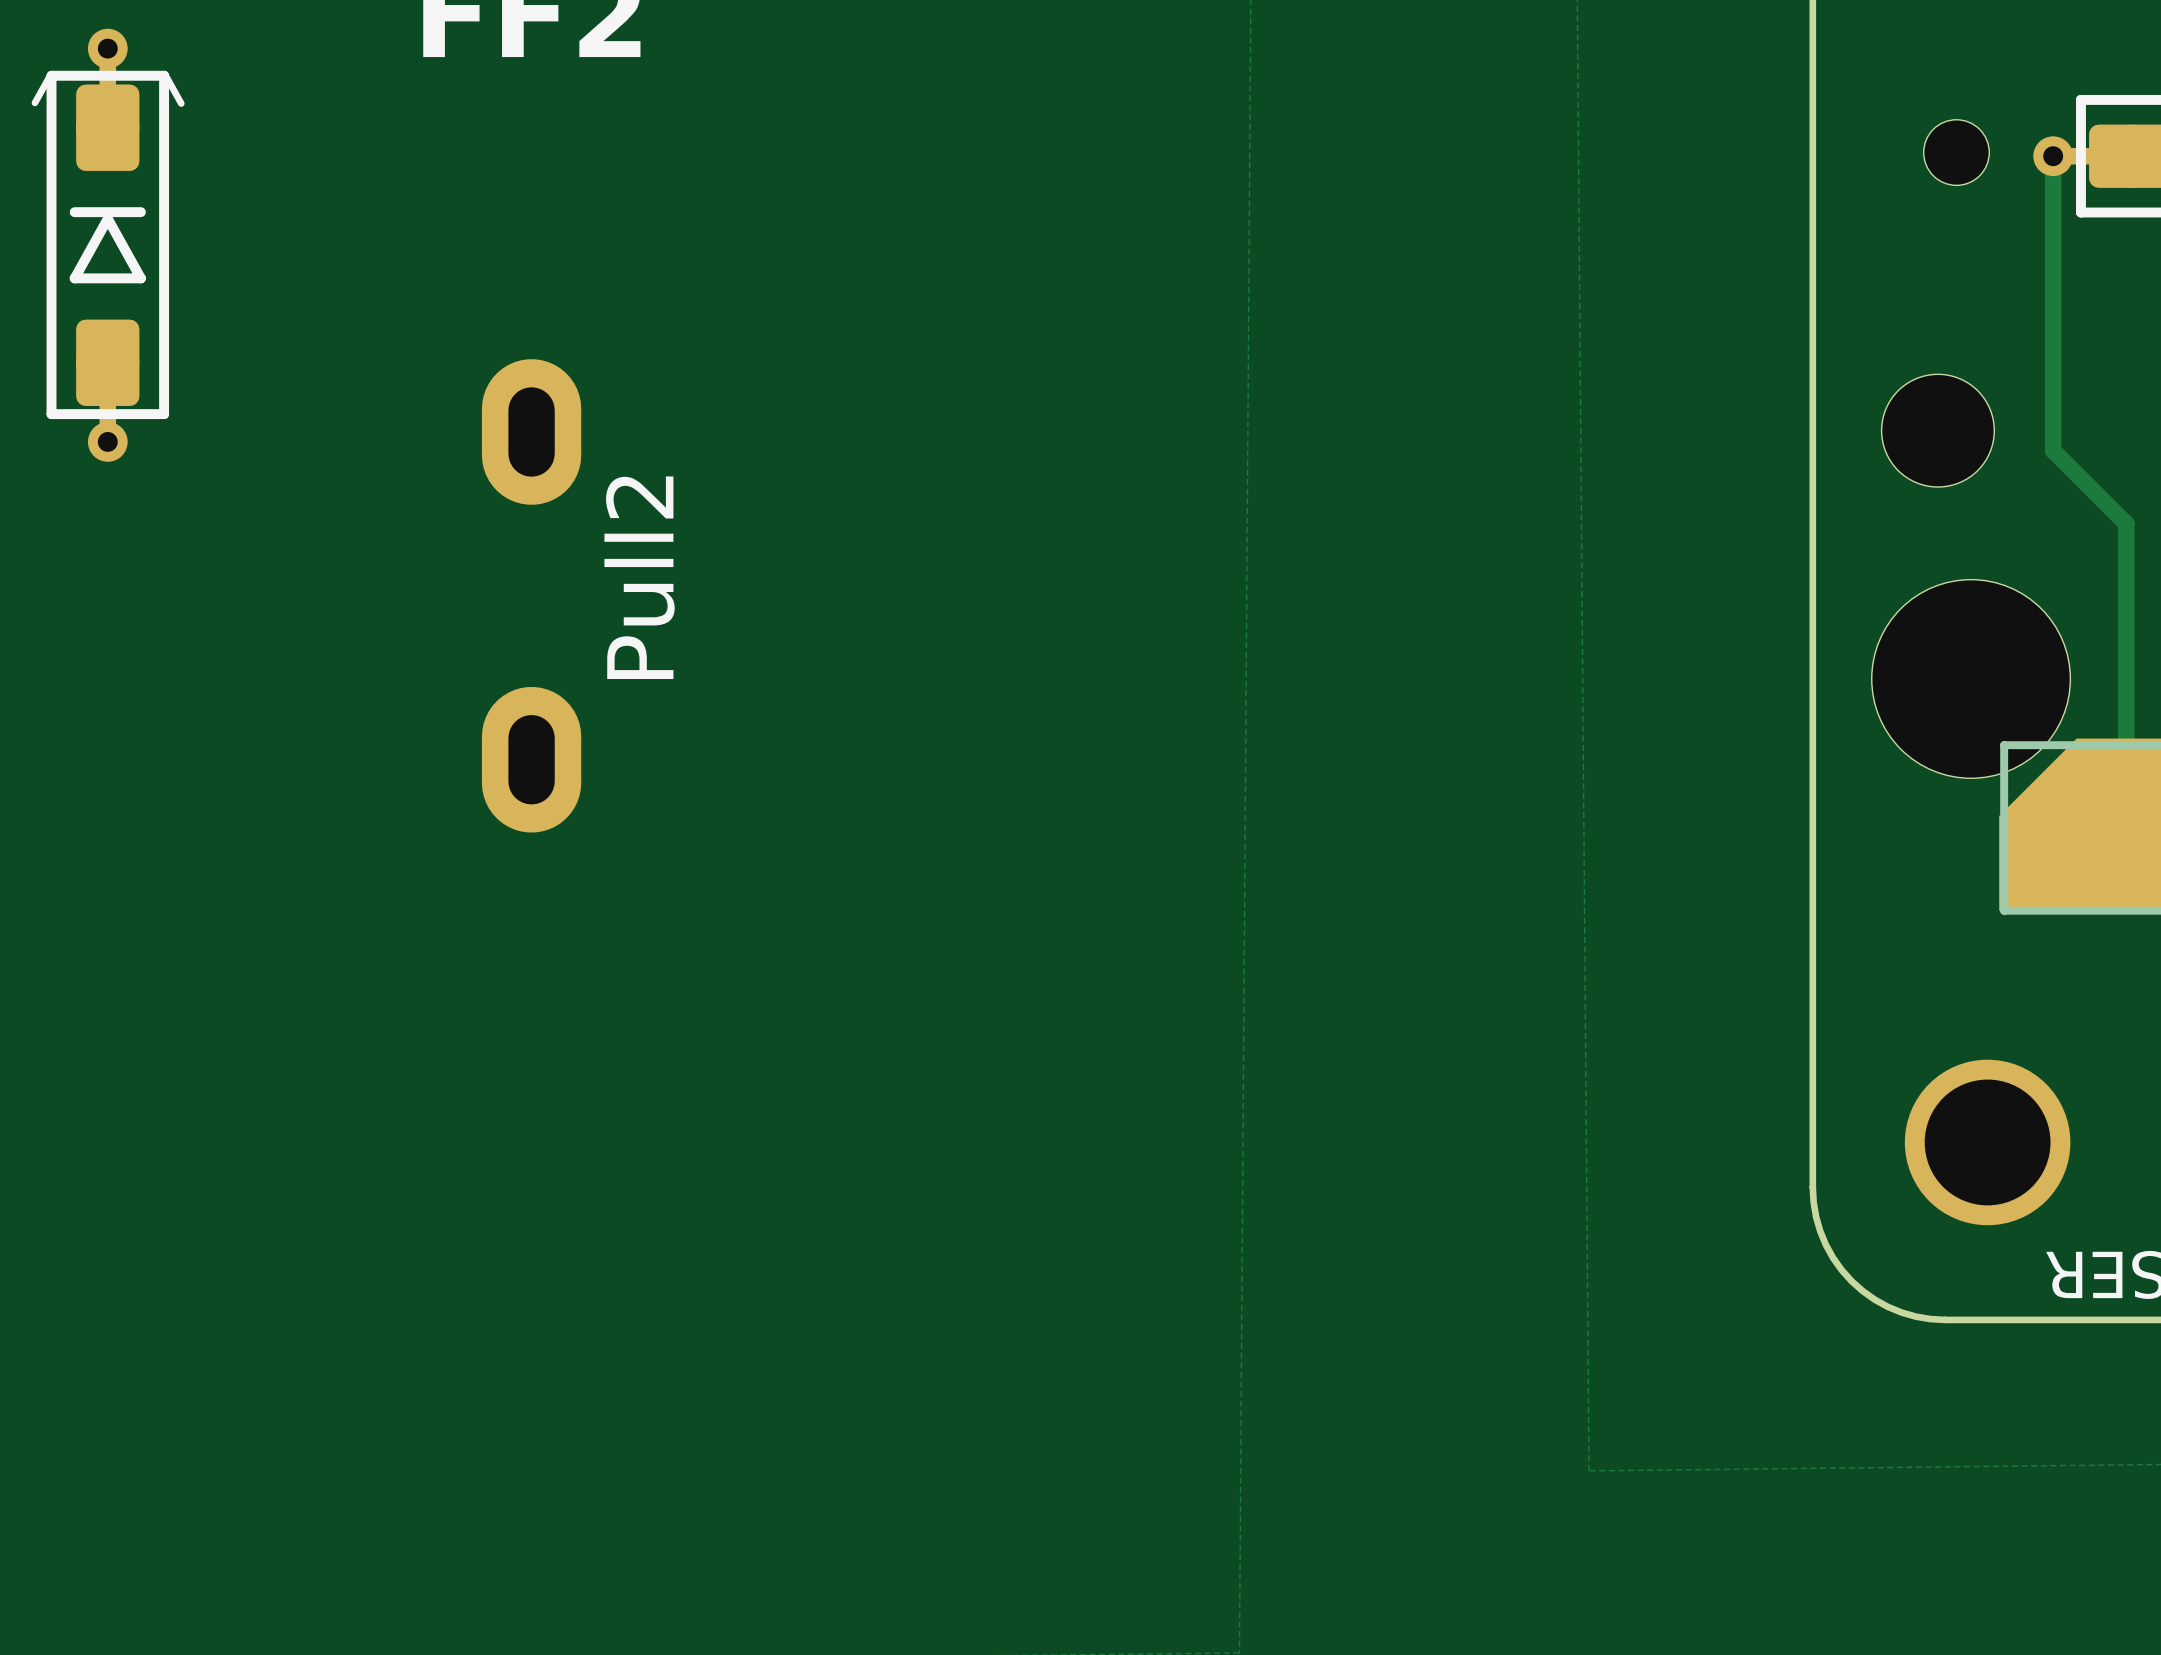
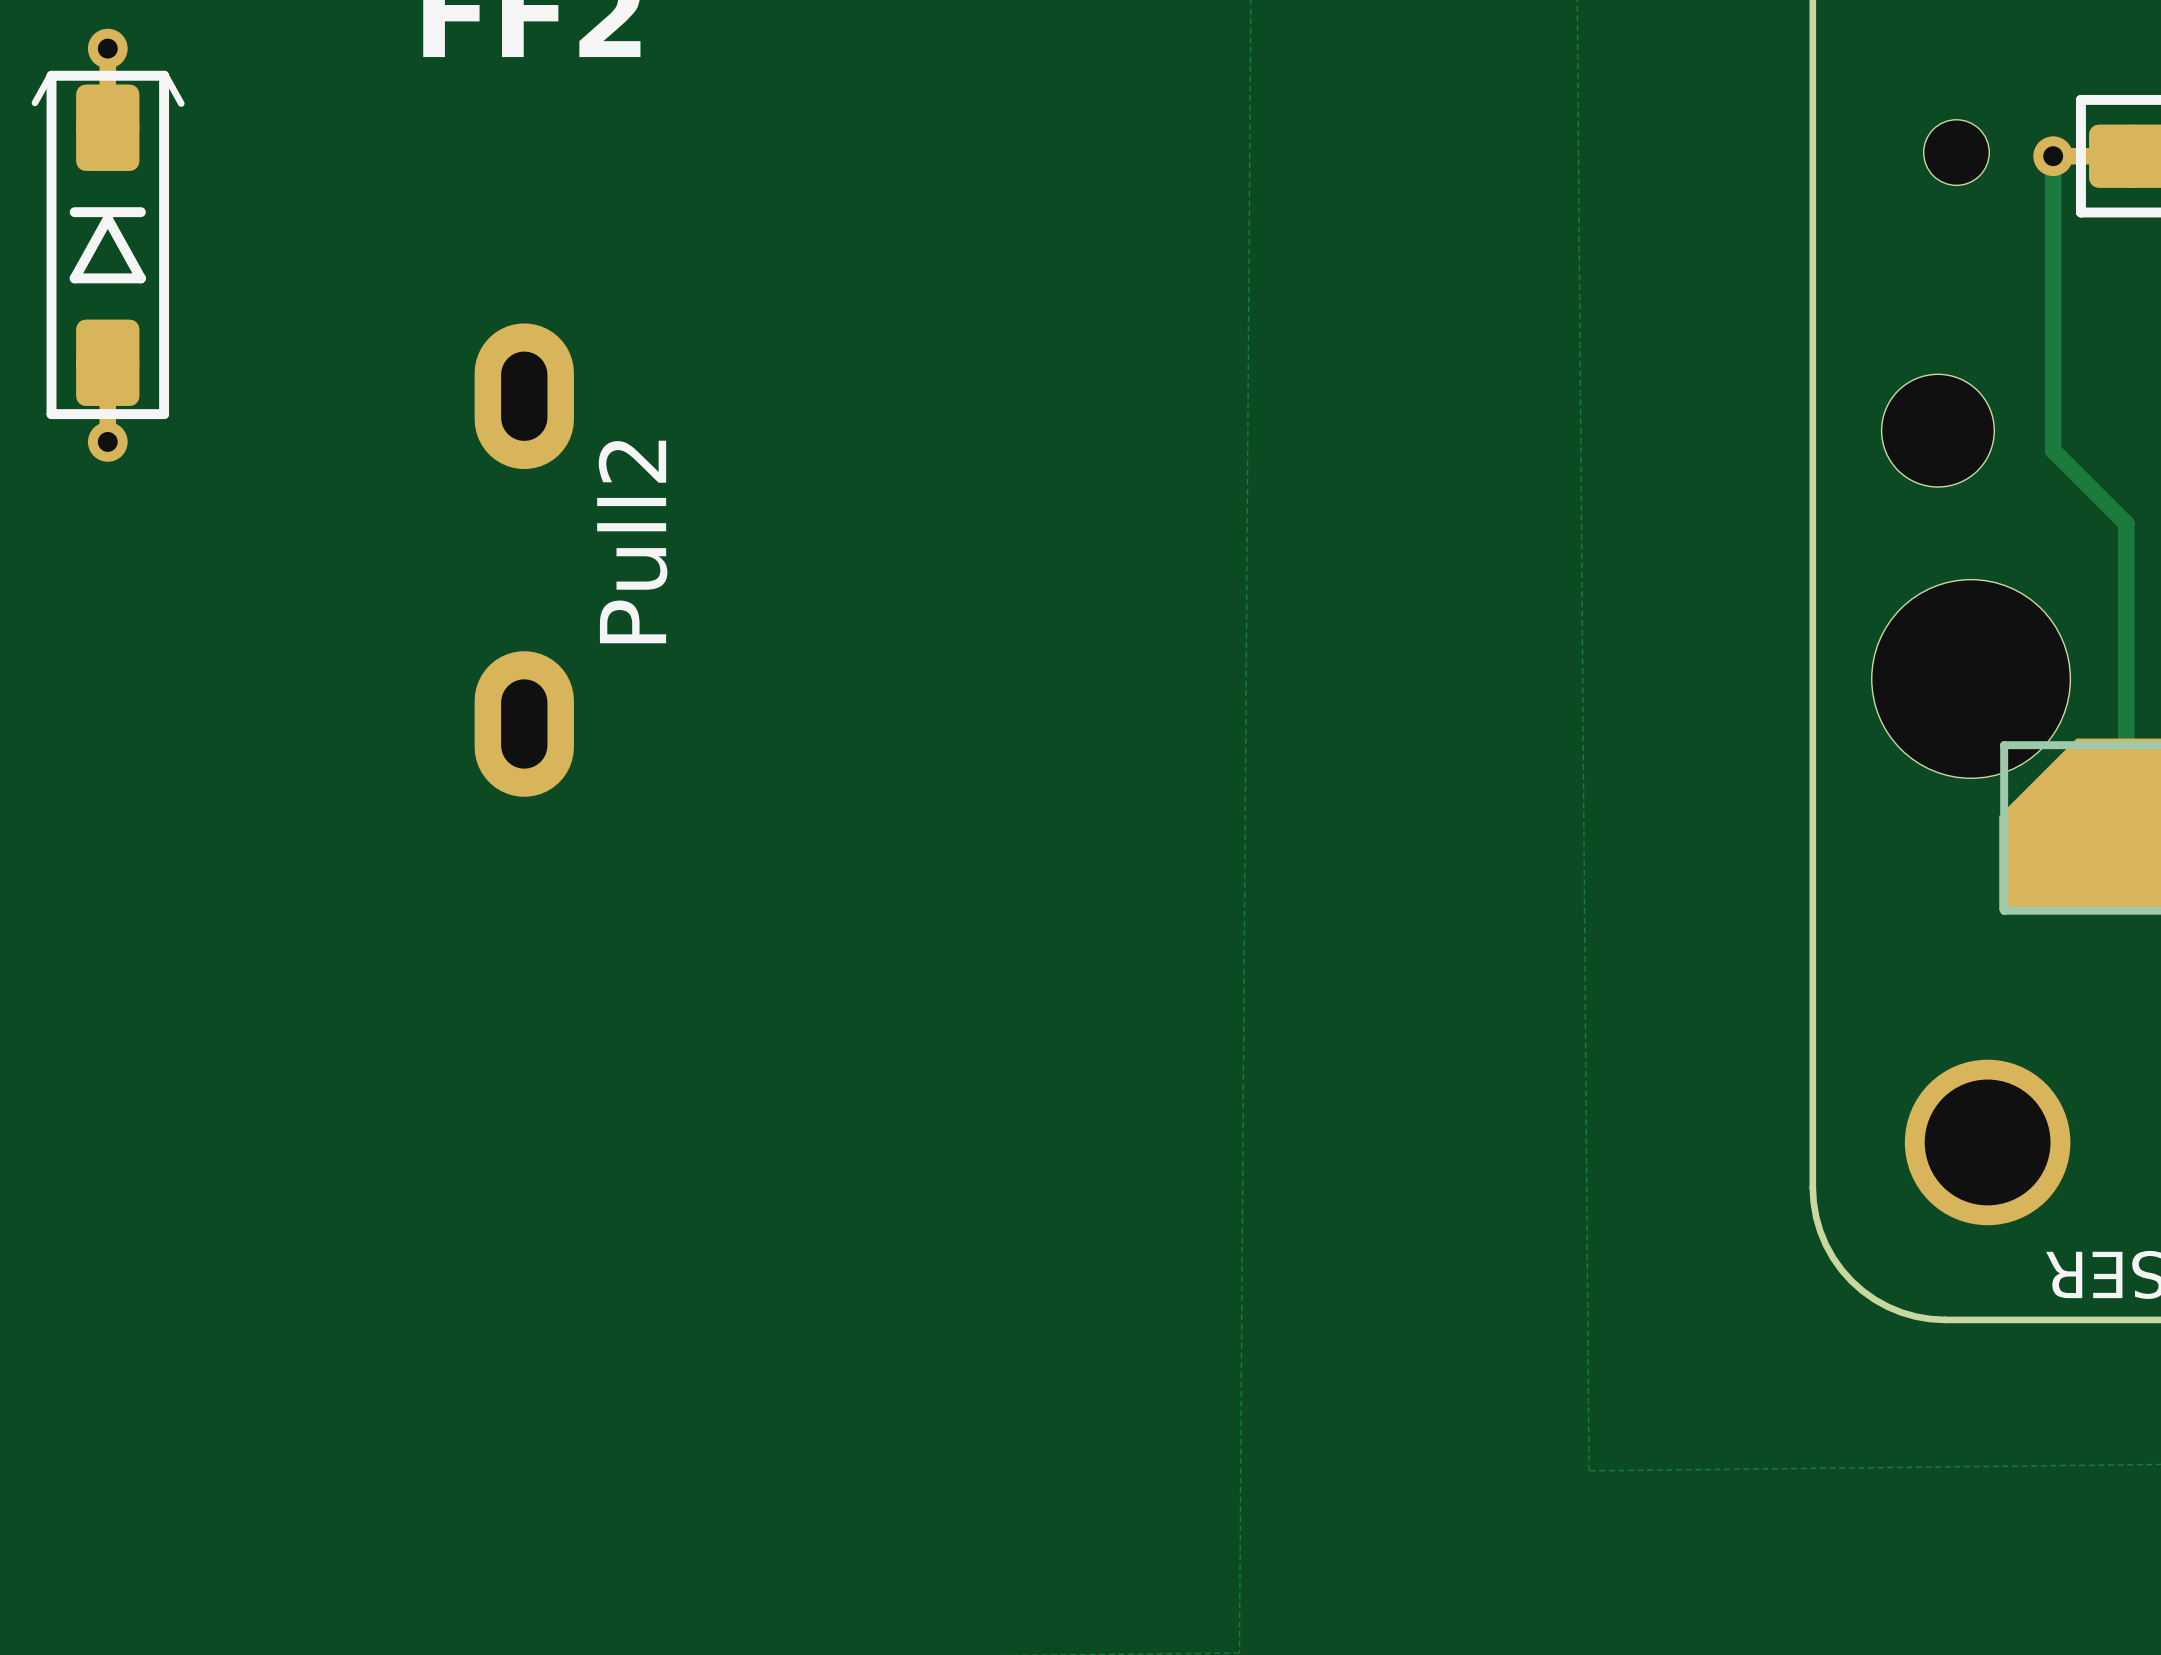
Pull2 position: (531, 595) -> (524, 560)

